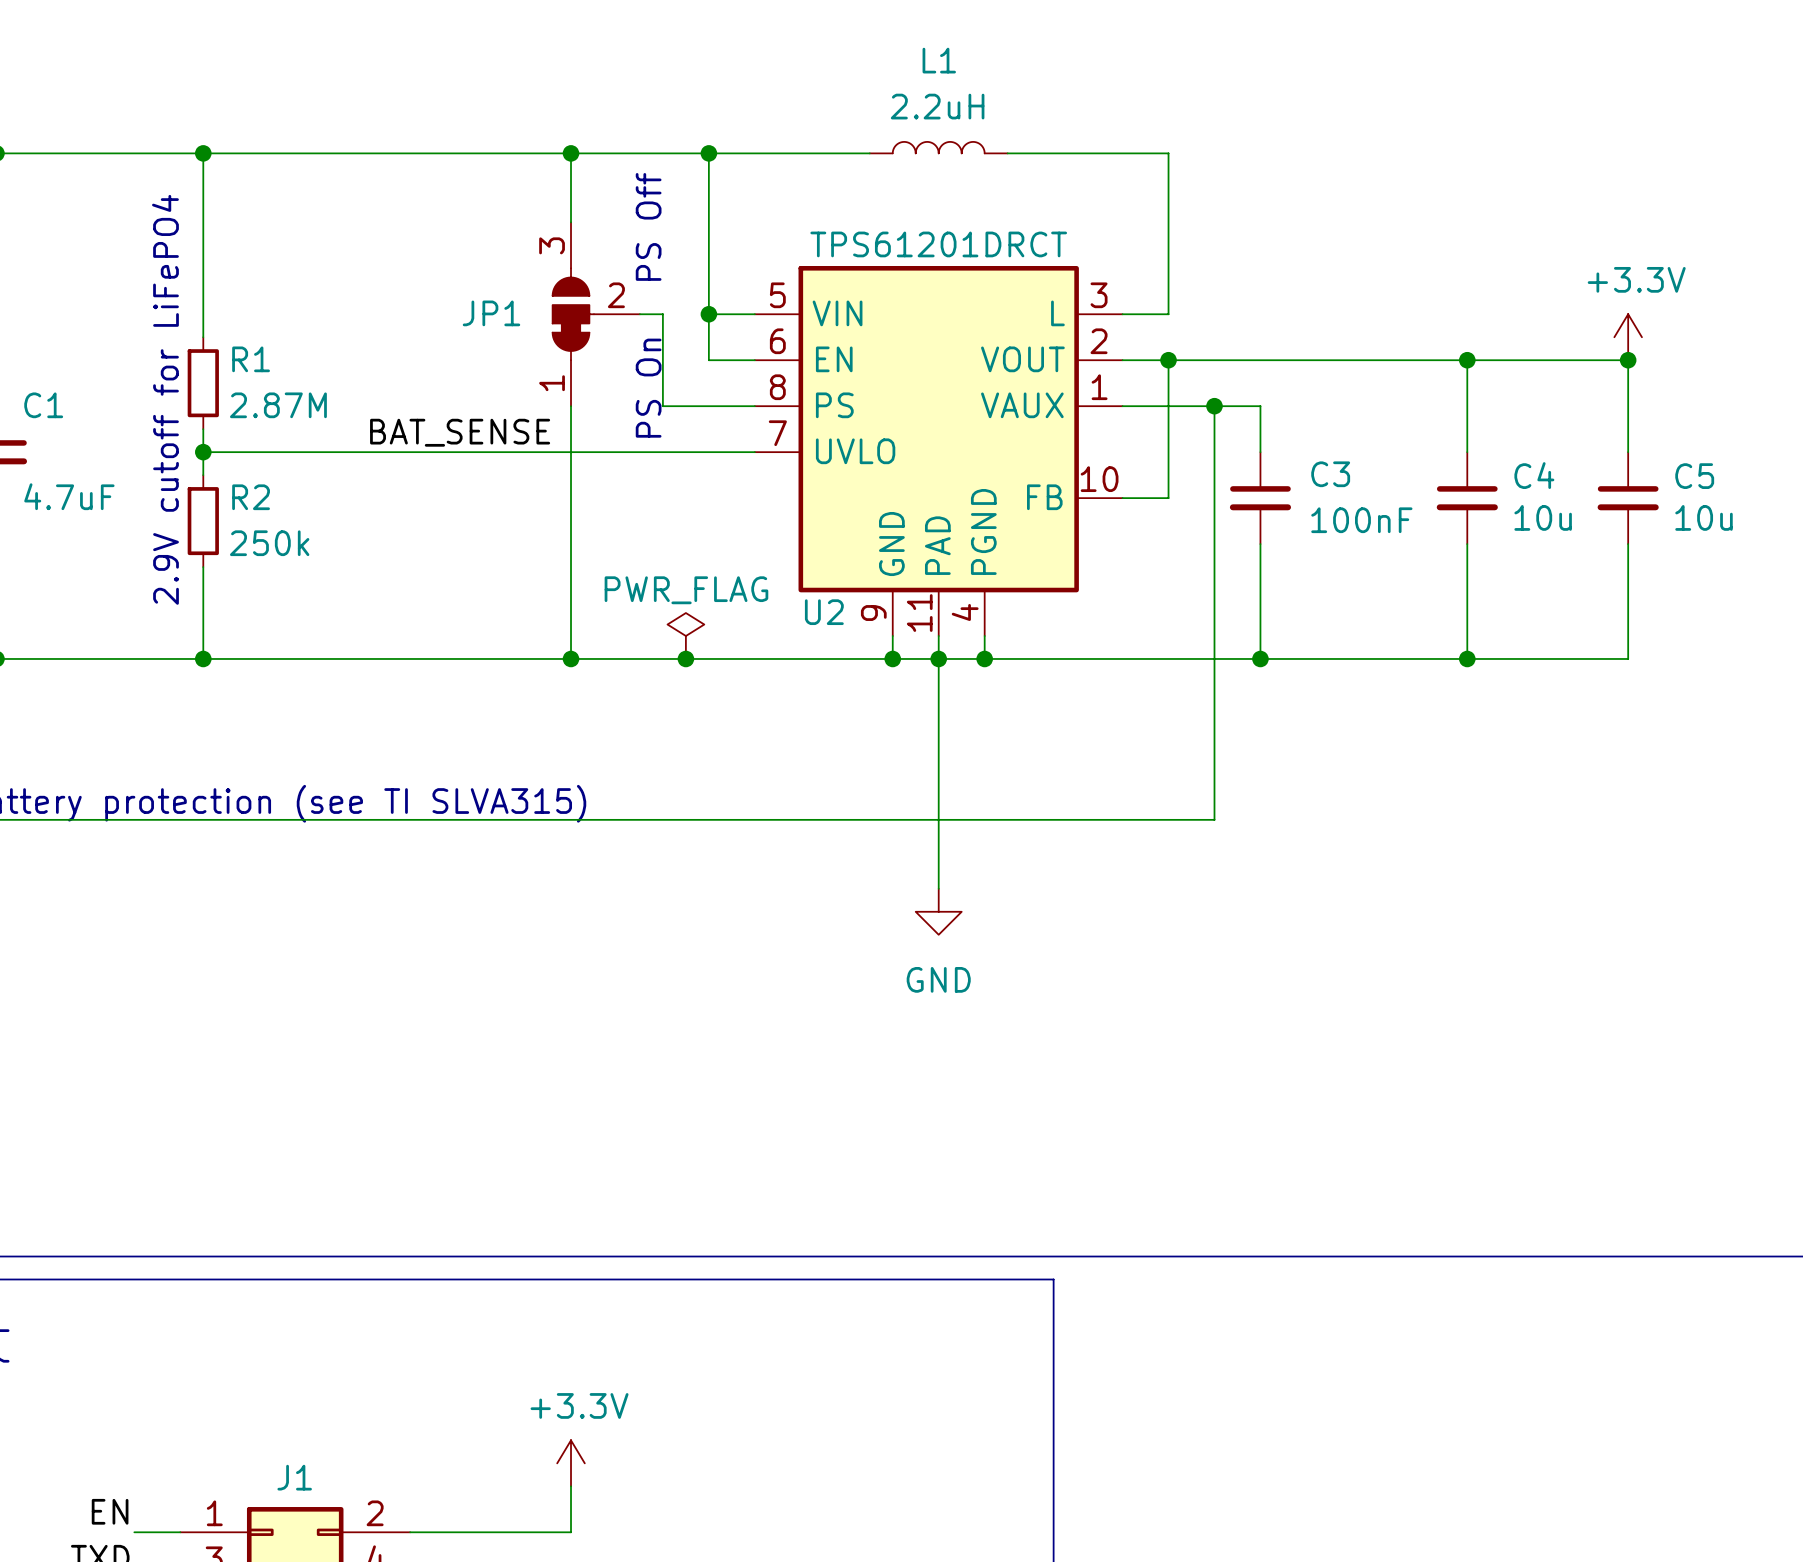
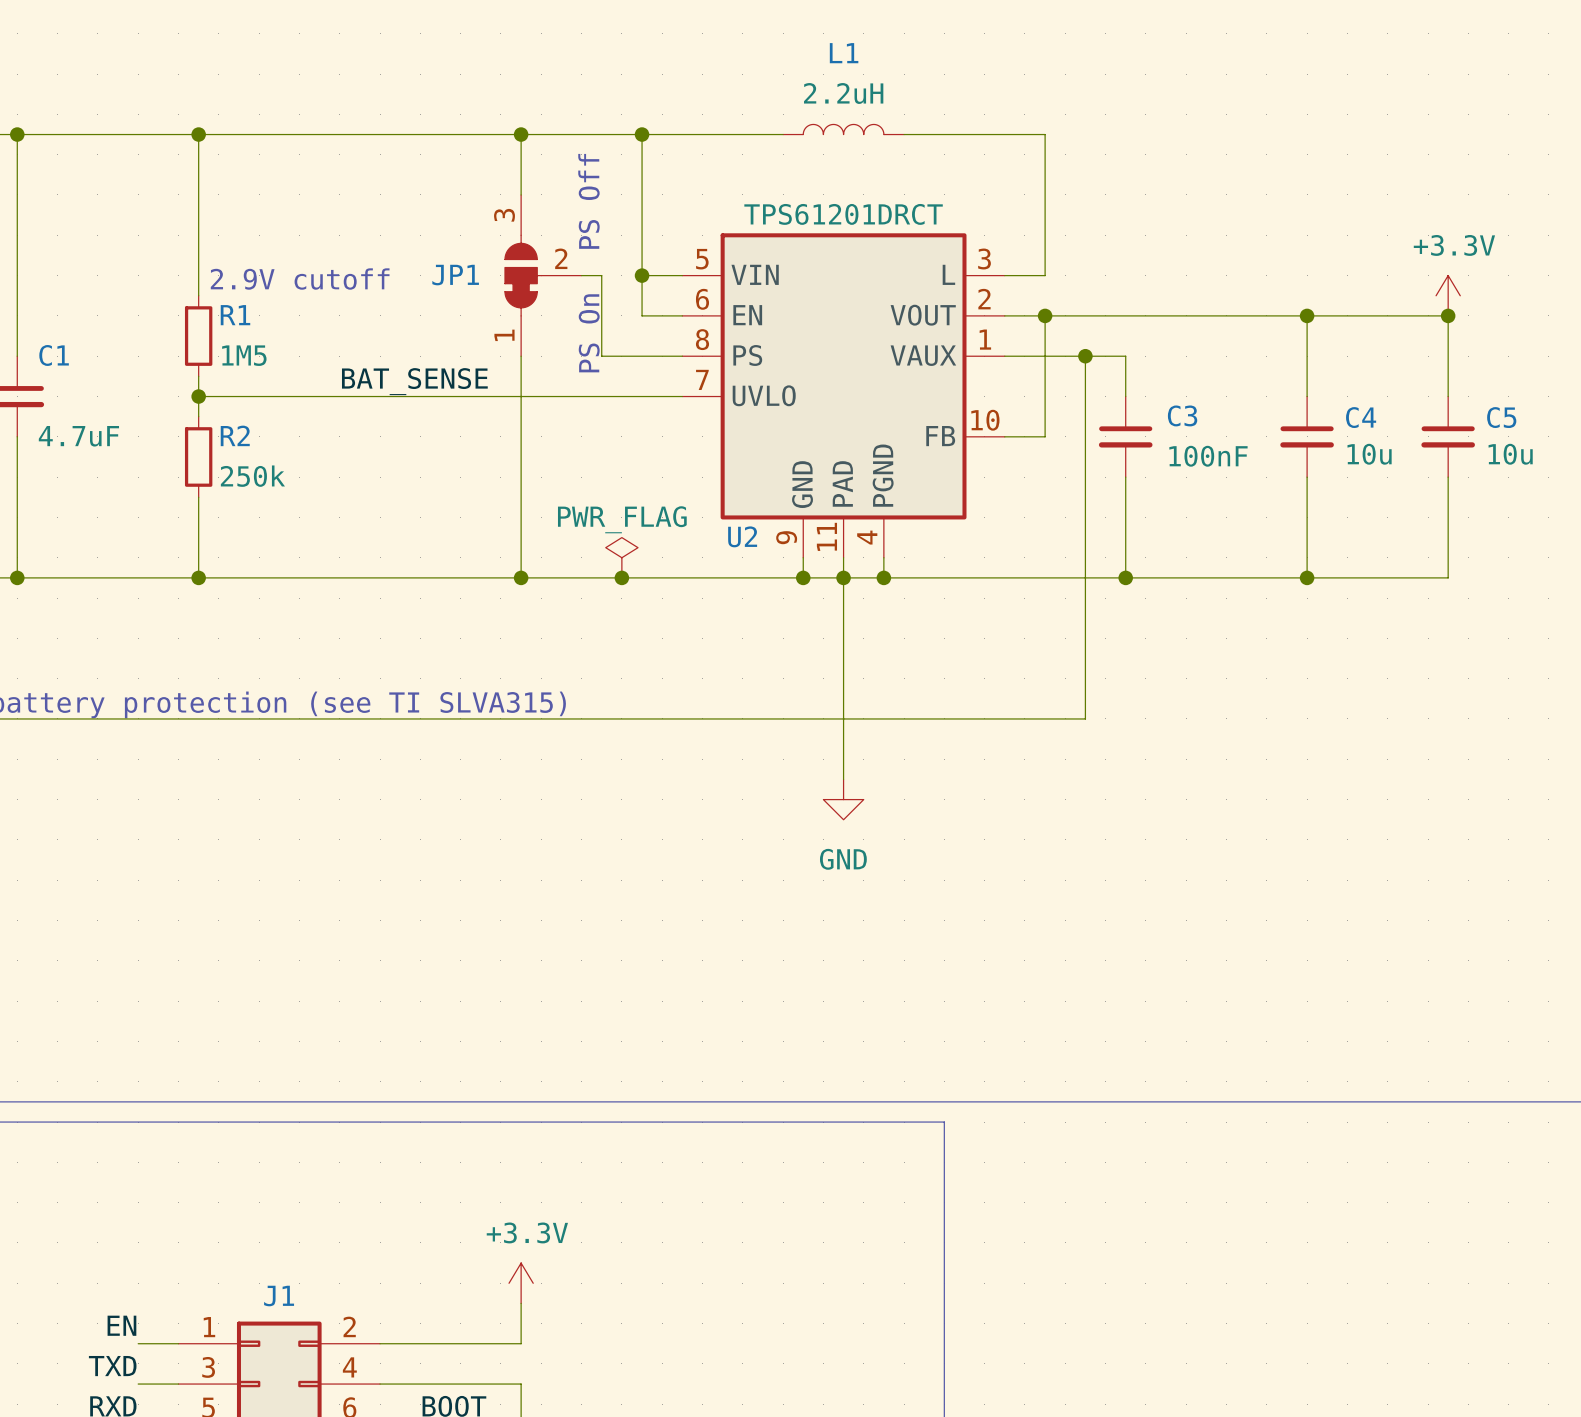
text: none -> 2.9V cutoff (300, 279)
text: 2.9V cutoff for LiFePO4 (165, 399) -> none
R1 value: 2.87M (278, 405) -> 1M5 (244, 355)

